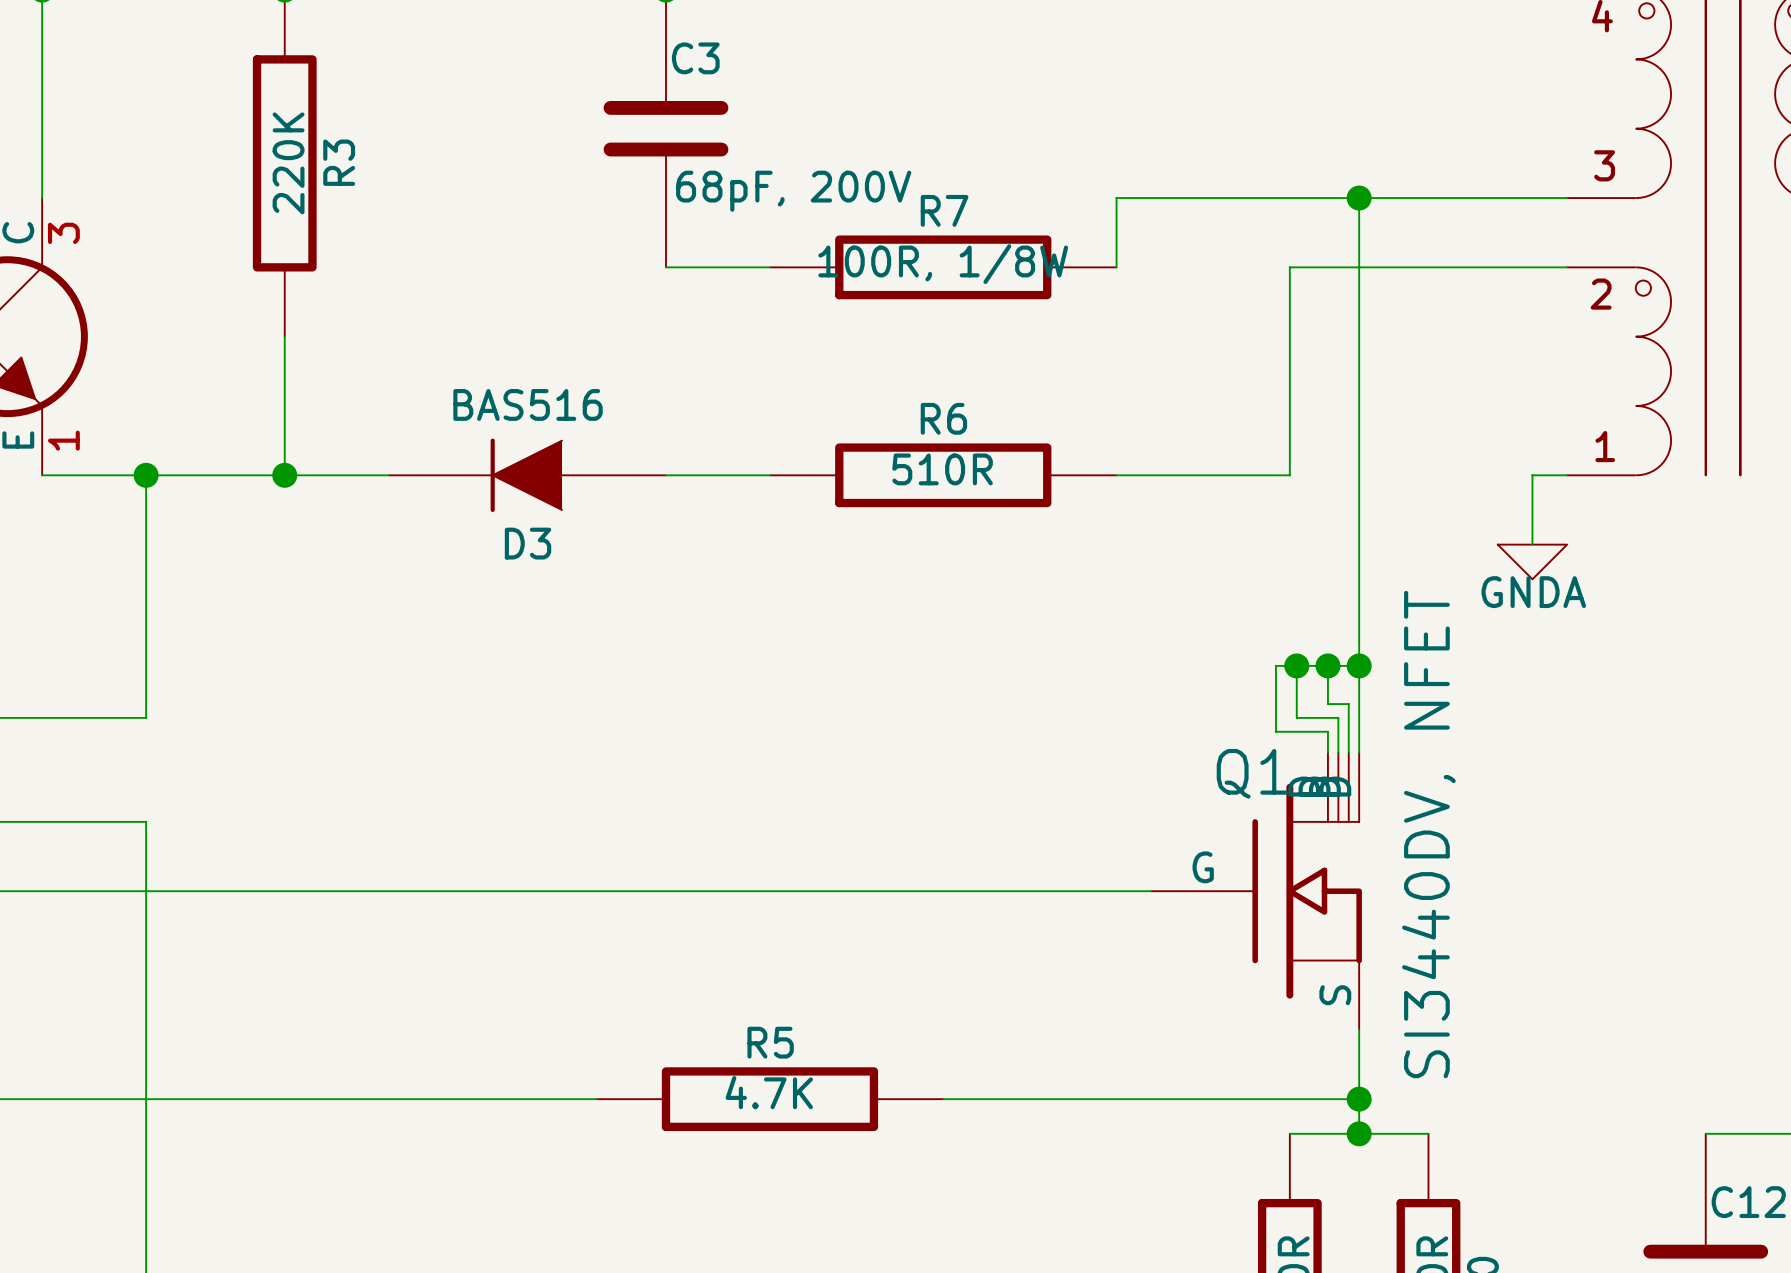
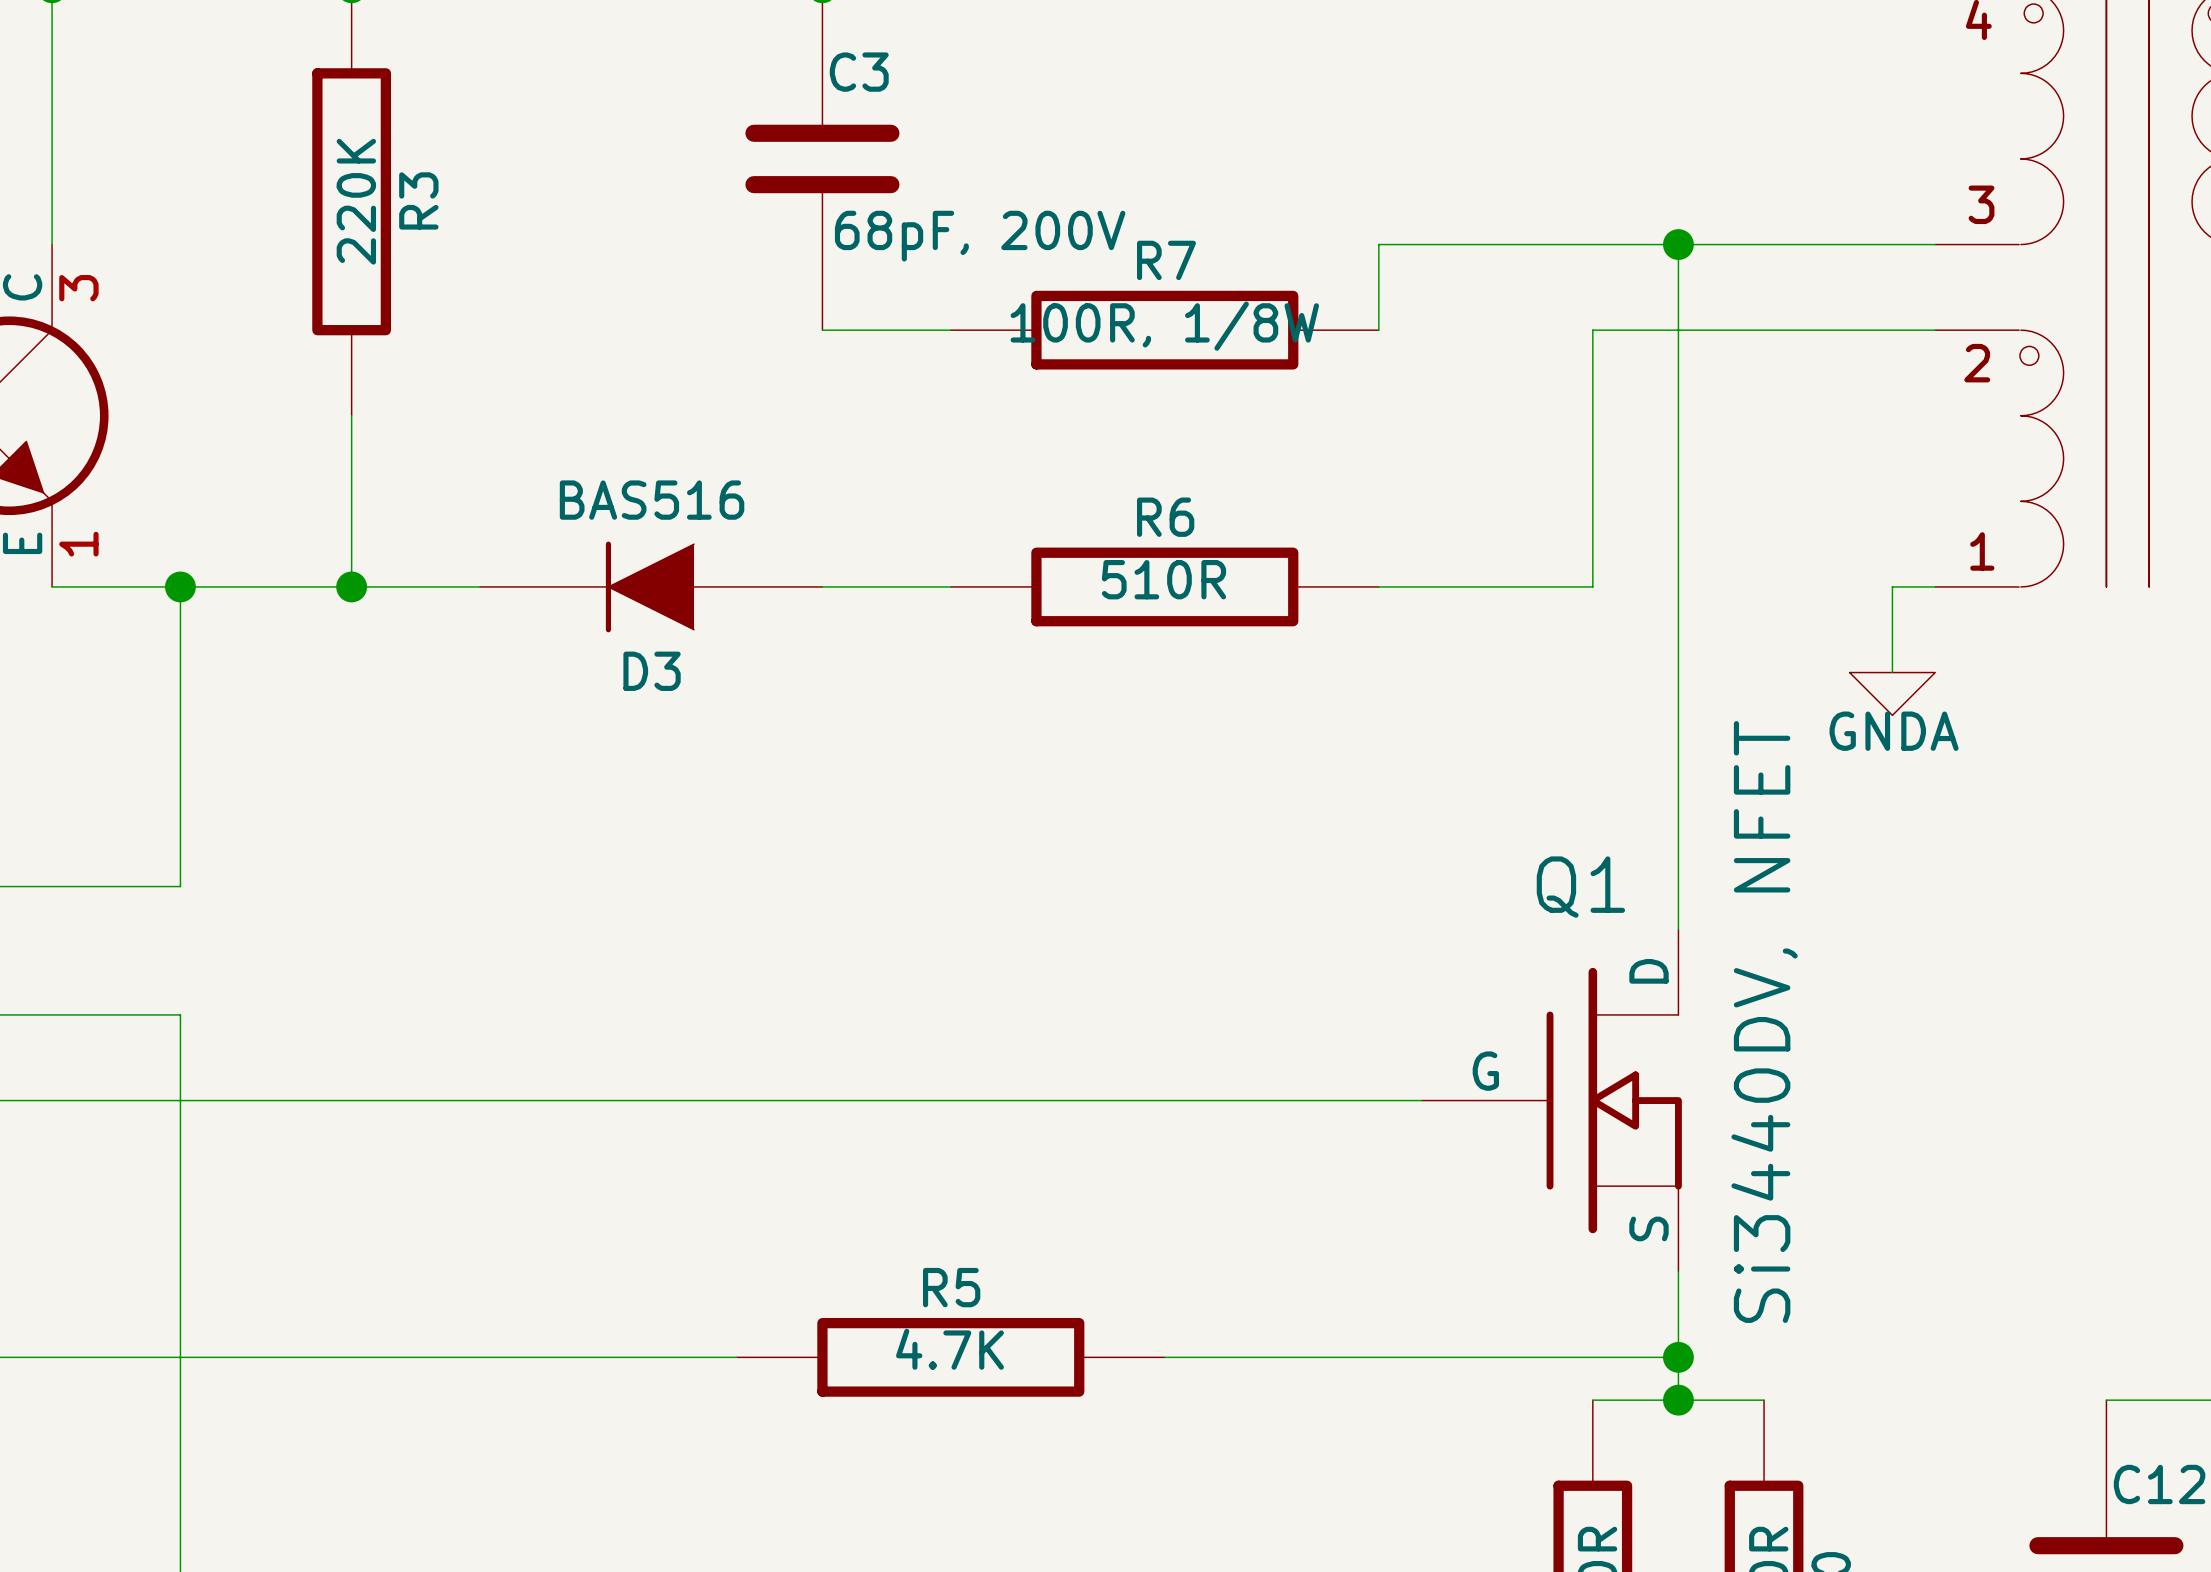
wire: (1296, 665) (1296, 717) (1338, 717) (1338, 752) -> none
junction: (1296, 665) -> none
wire: (1327, 665) (1327, 704) (1348, 704) (1348, 752) -> none
junction: (1327, 665) -> none
wire: (1359, 665) (1275, 665) (1275, 731) (1327, 731) (1327, 752) -> none
junction: (1359, 665) -> none
Q1 symbol: [1151, 752, 1362, 1030] -> [1421, 929, 1682, 1272]
Q1 name position: Q1 (1252, 773) -> Q1 (1580, 887)
Q1 value: SI3440DV, NFET (1428, 834) -> Si3440DV, NFET (1764, 1022)

